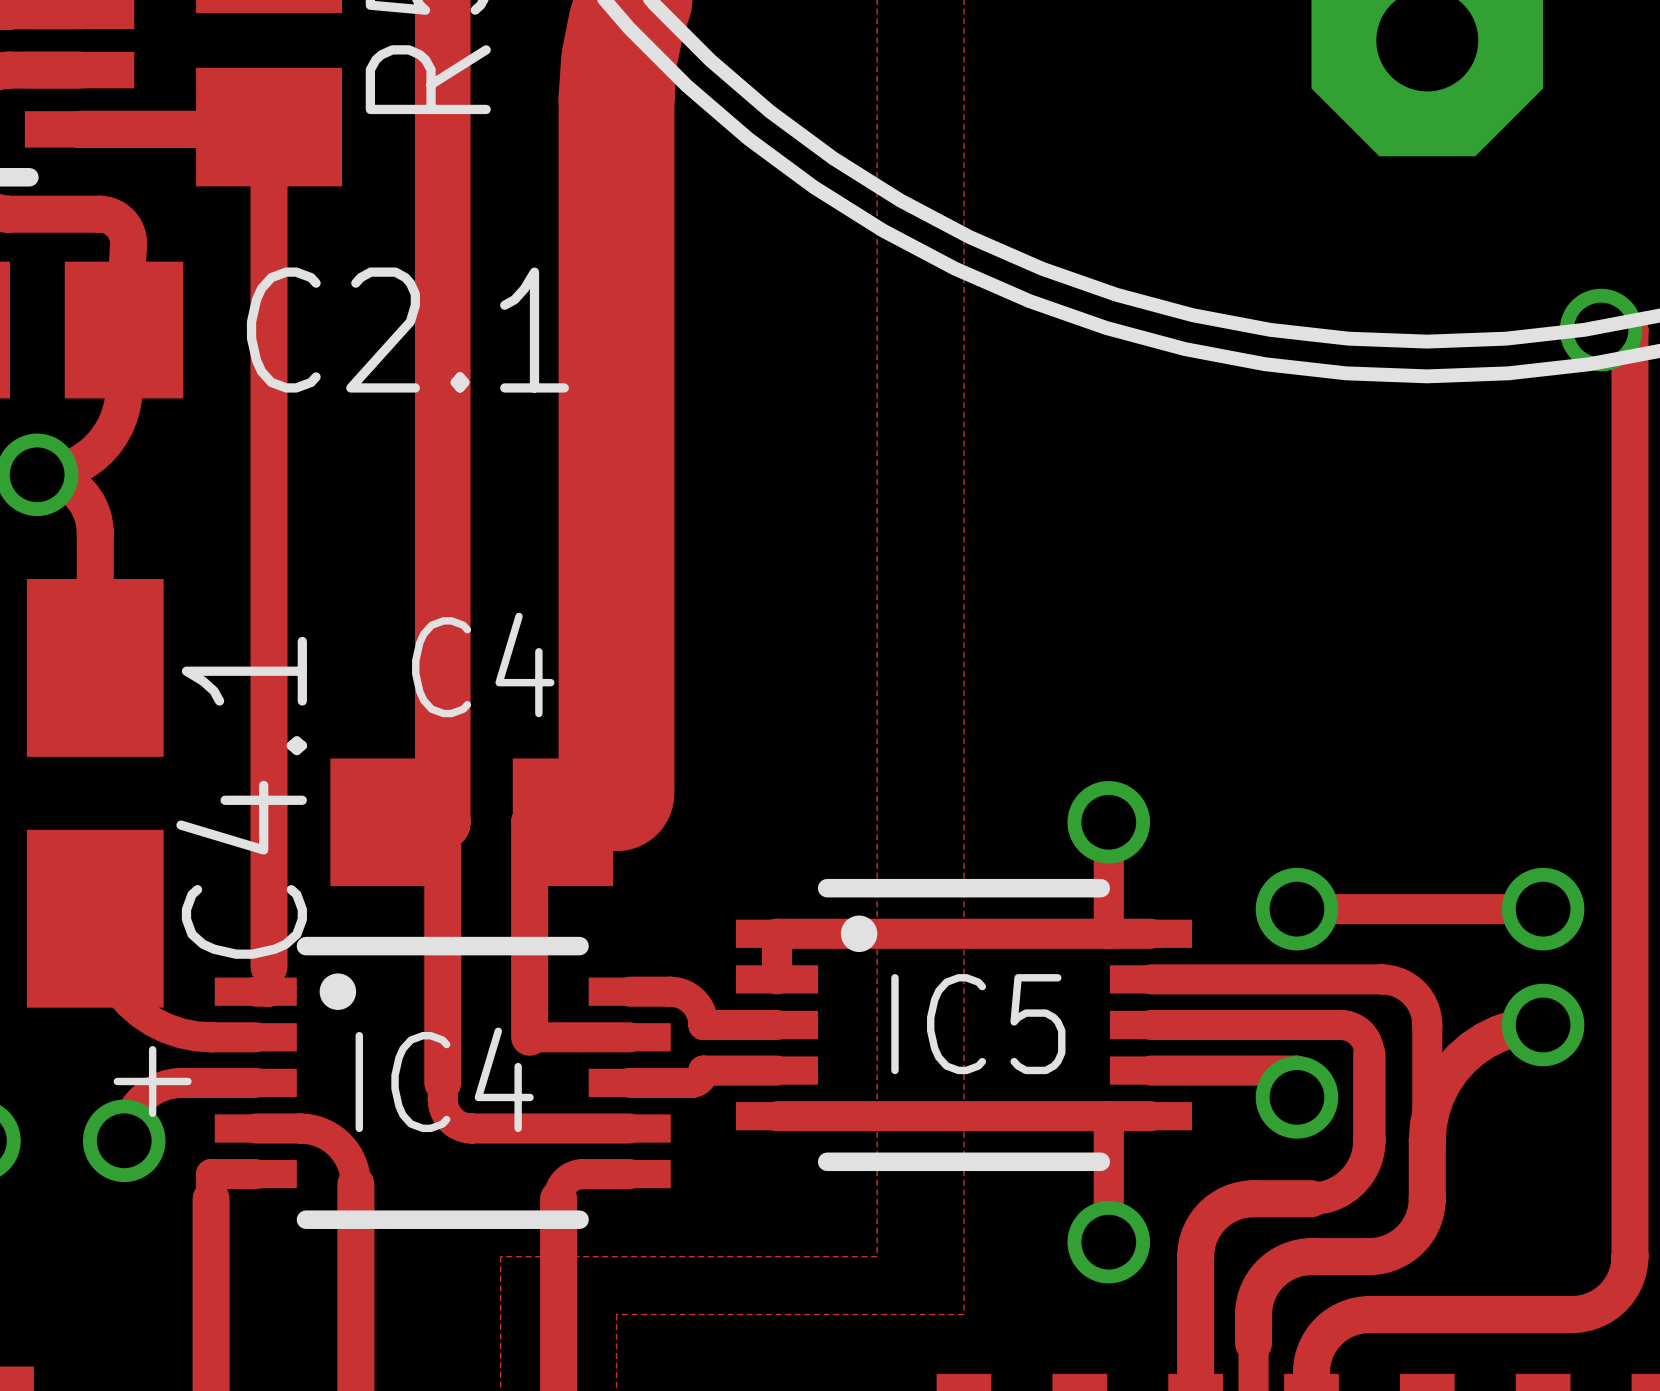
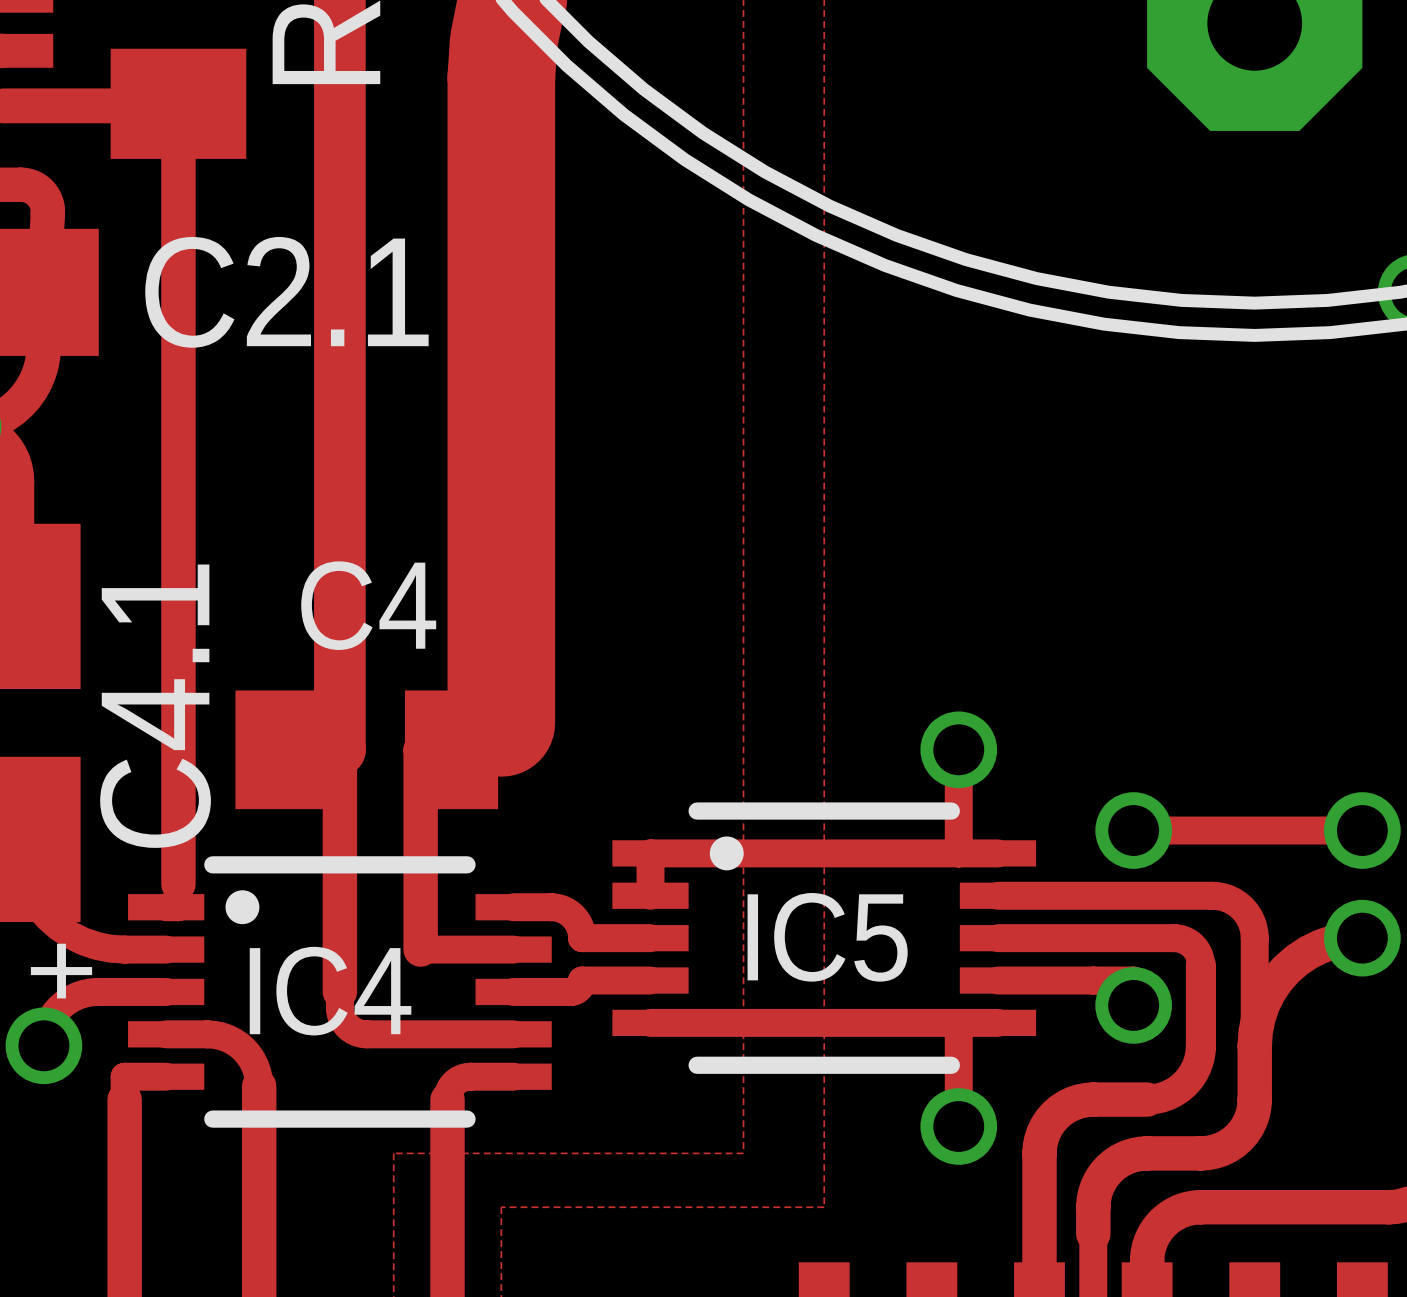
via position: (1108, 1242) -> (958, 1126)

